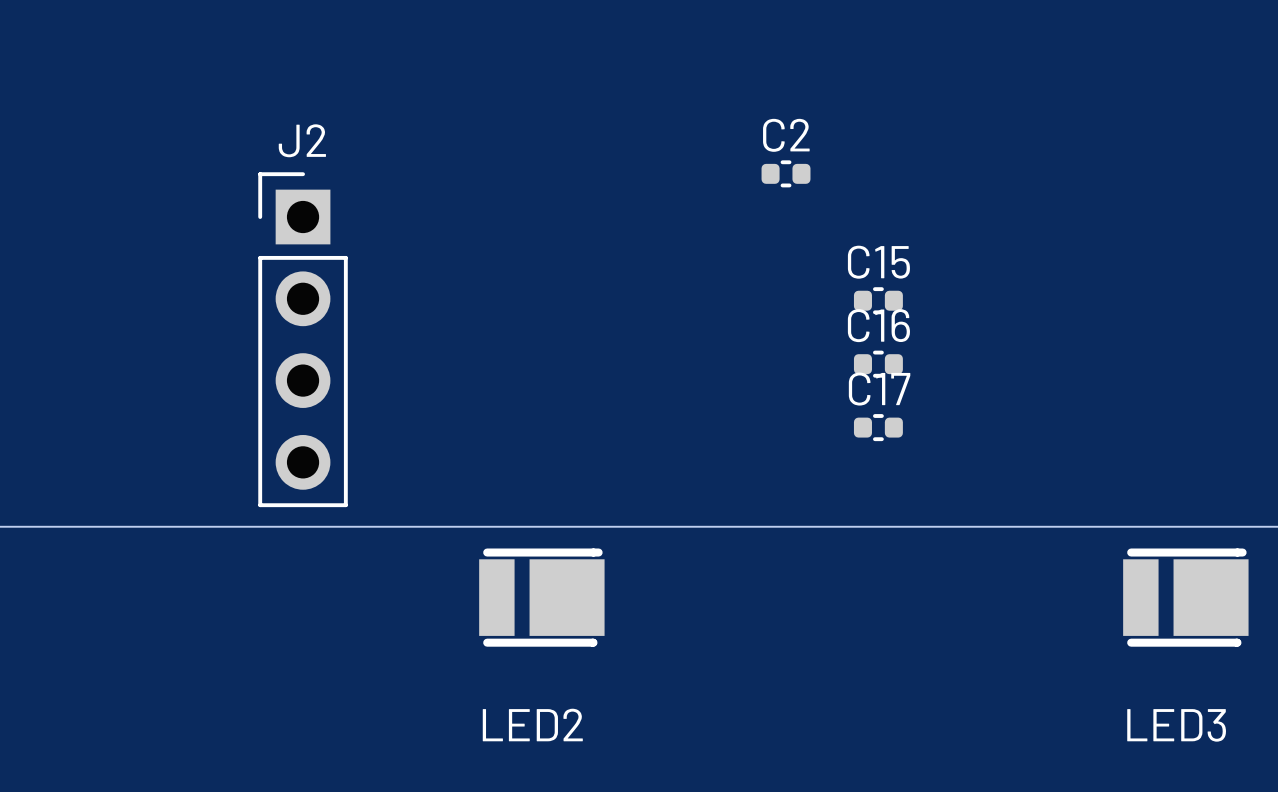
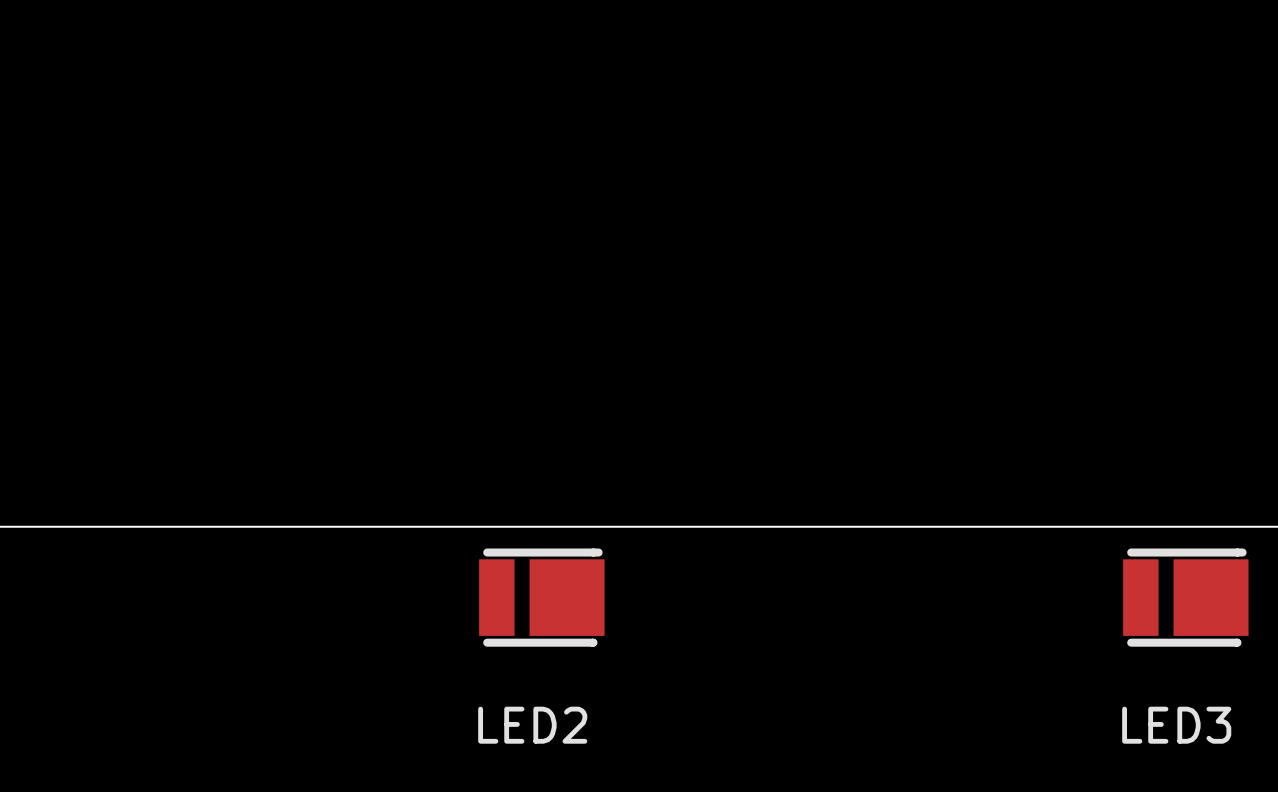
C2: (786, 173) -> none
C15: (878, 300) -> none
J2: (303, 339) -> none
C16: (878, 364) -> none
C17: (878, 427) -> none

